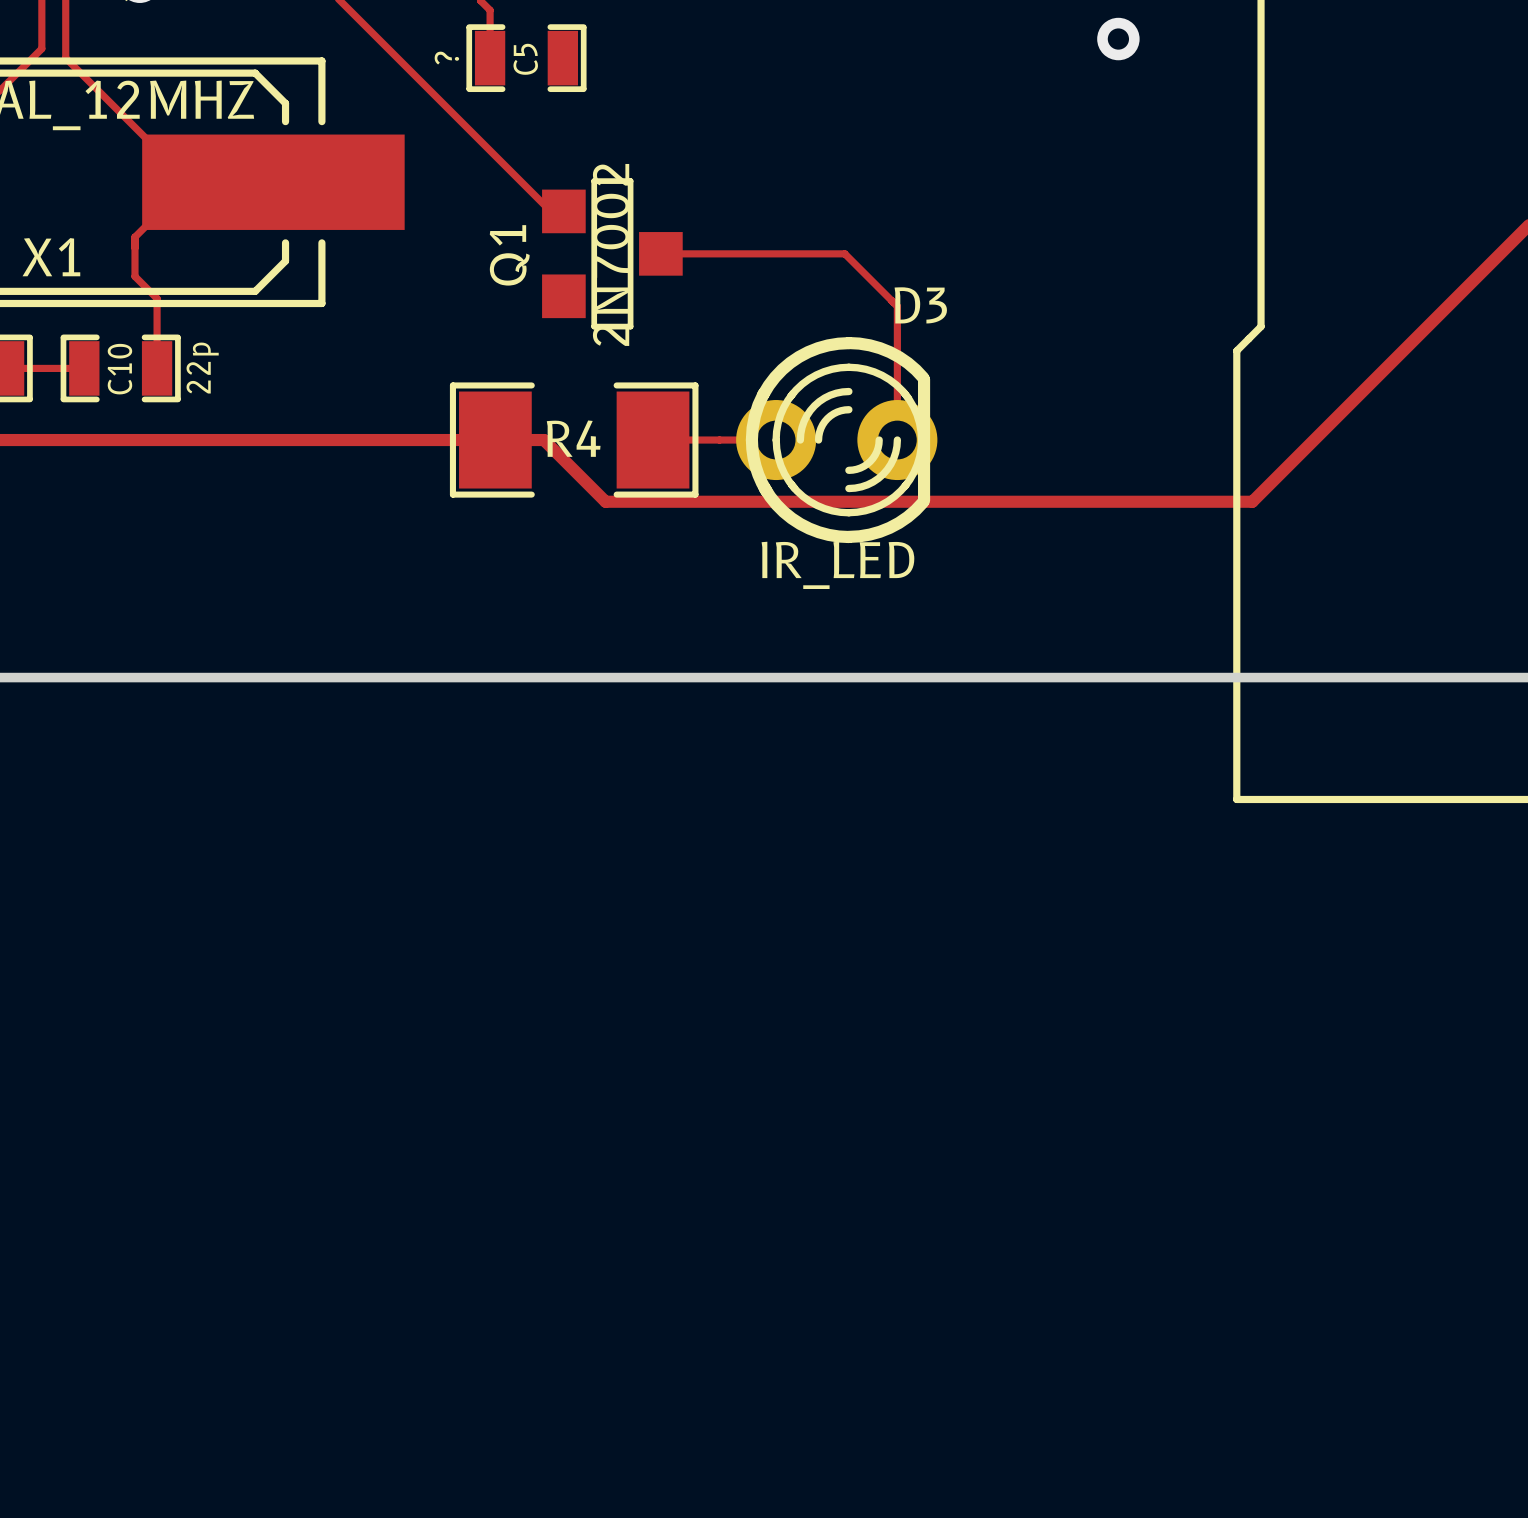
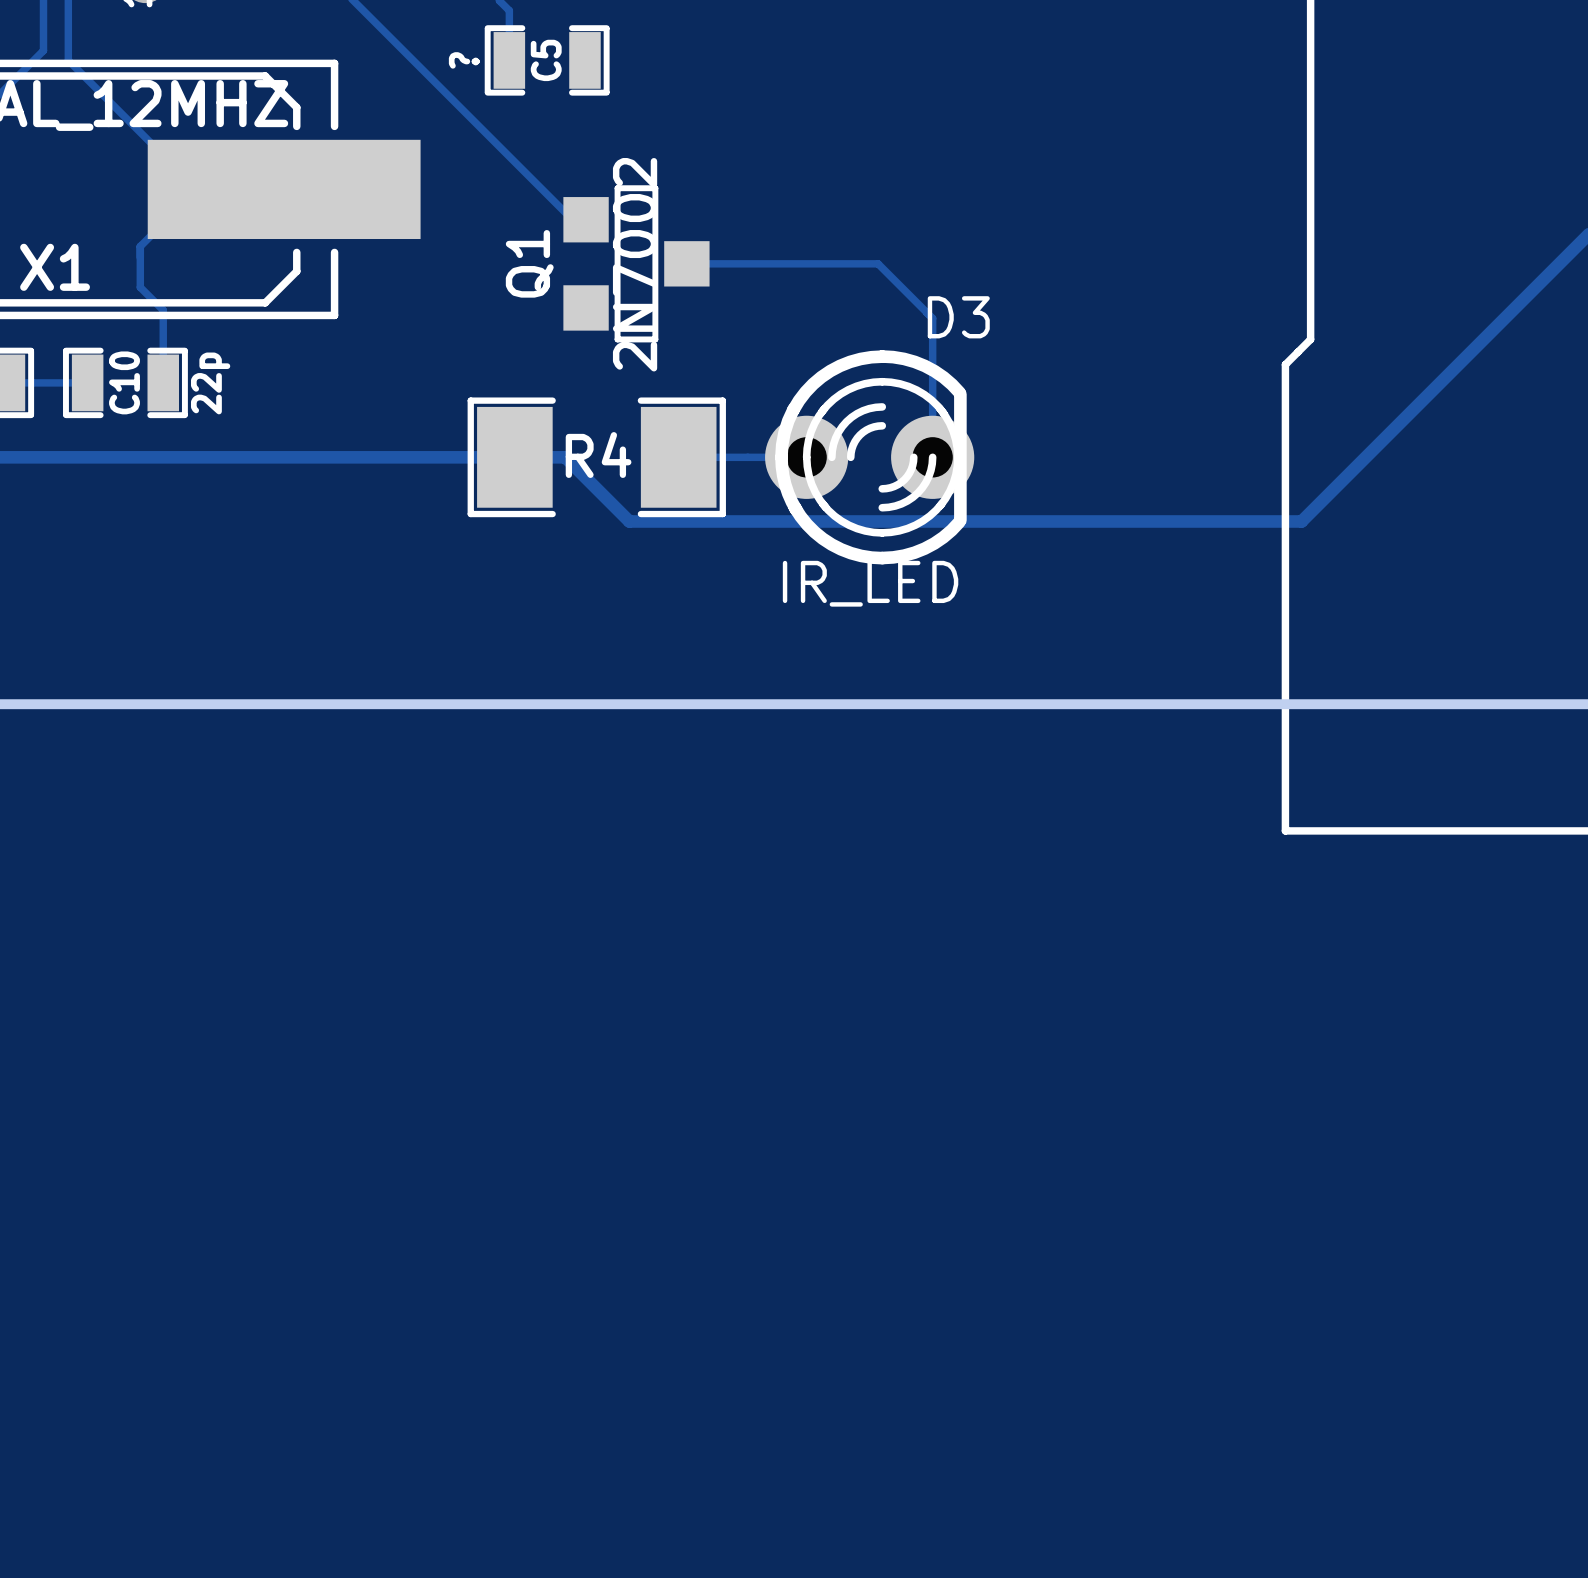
via: (1118, 39) -> none

